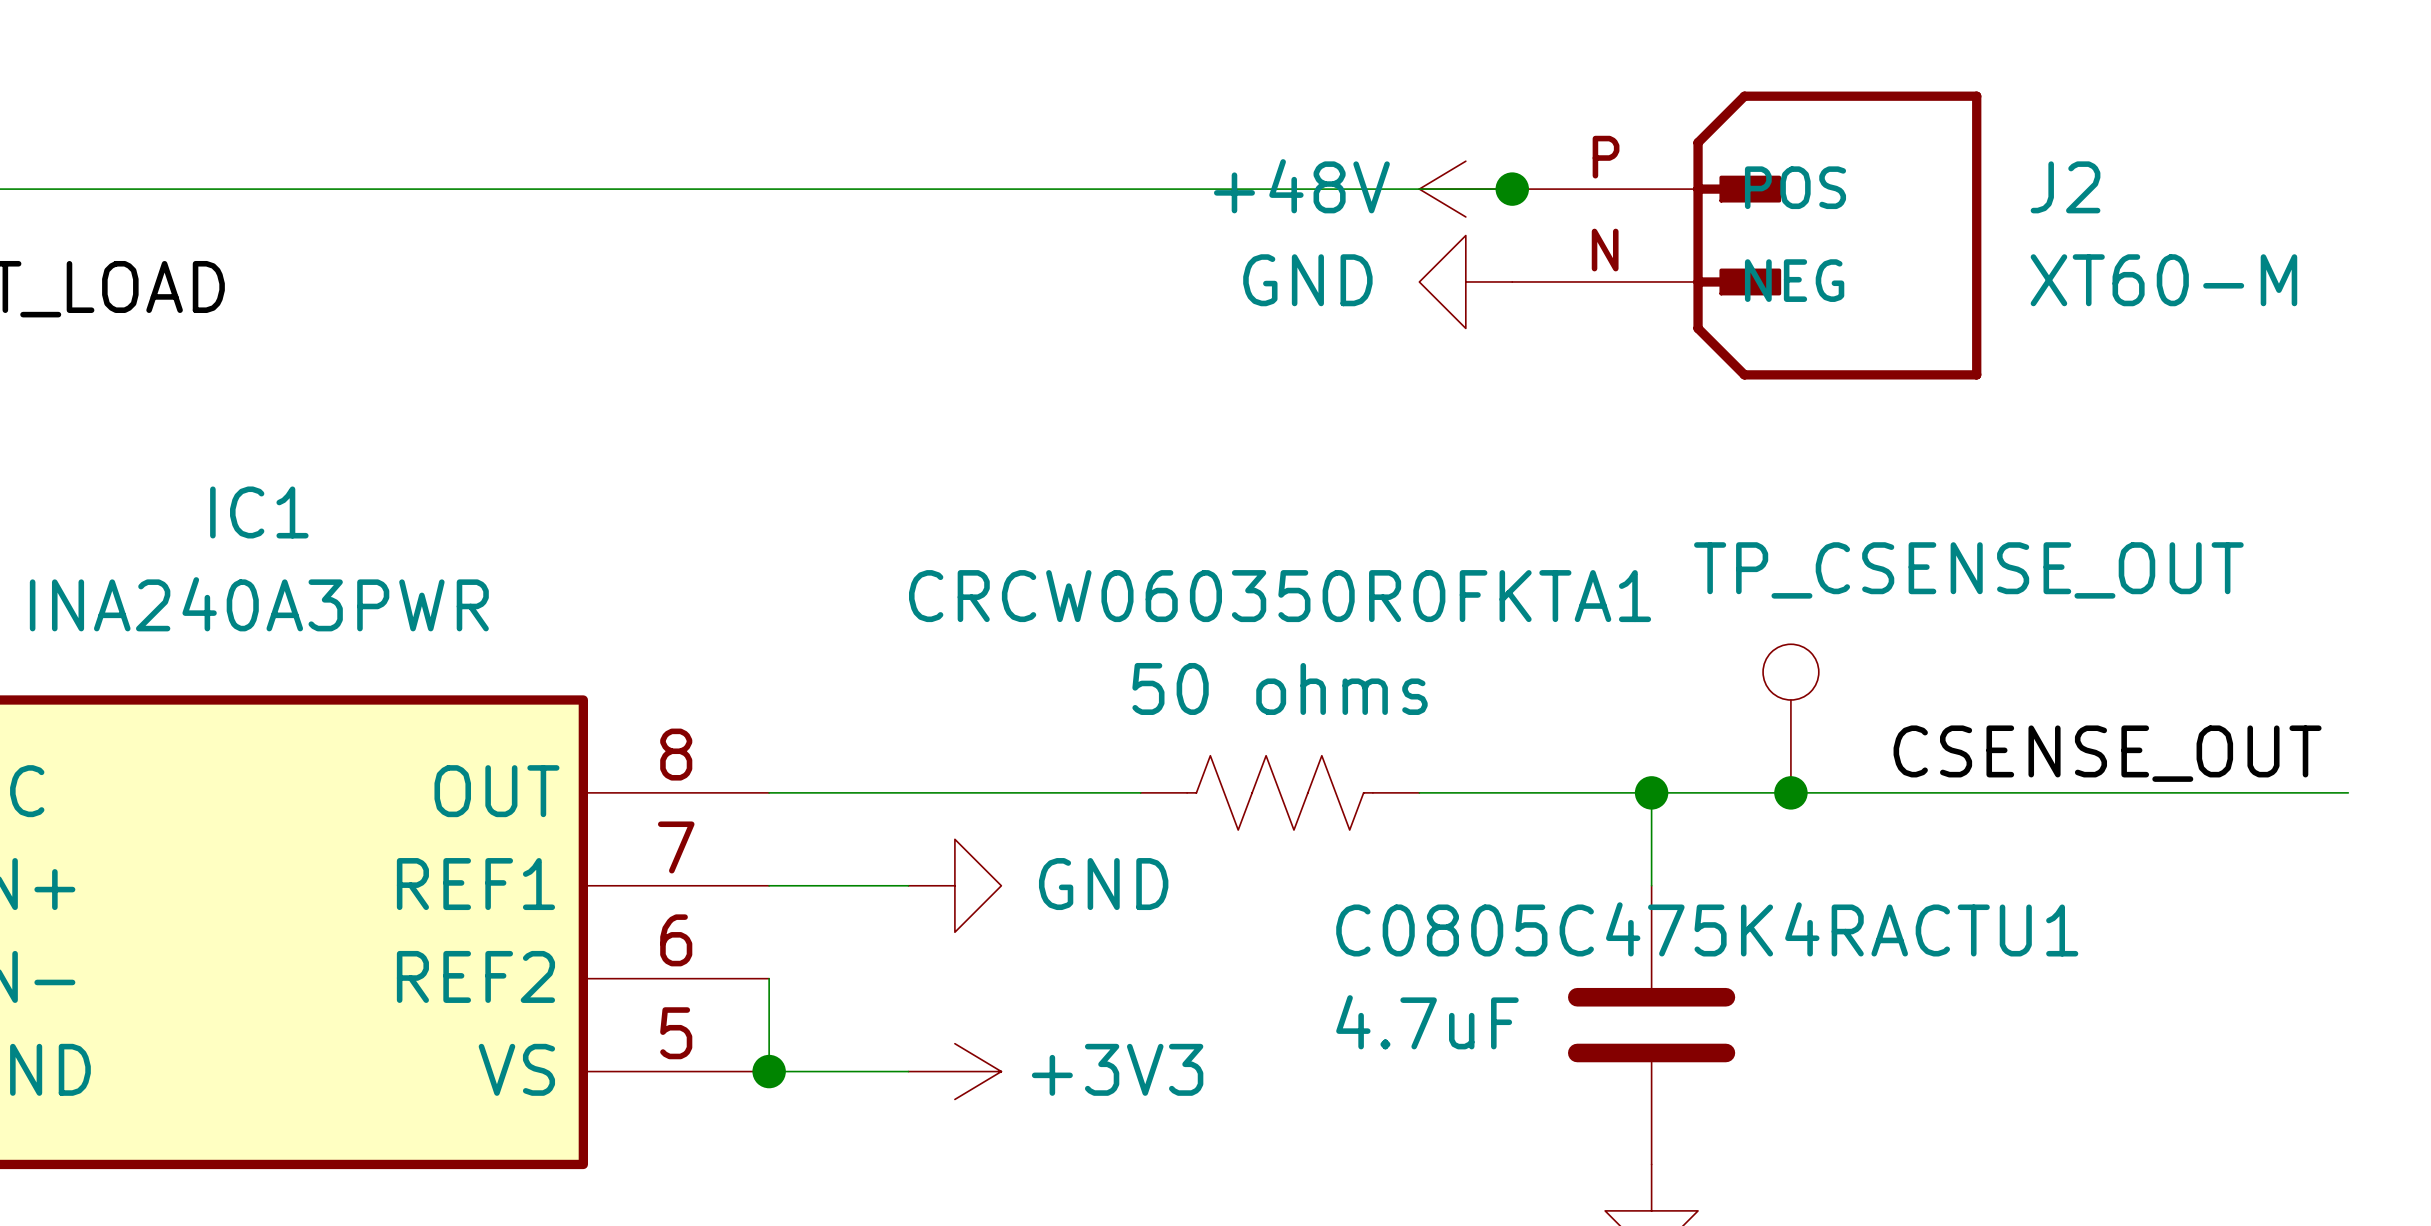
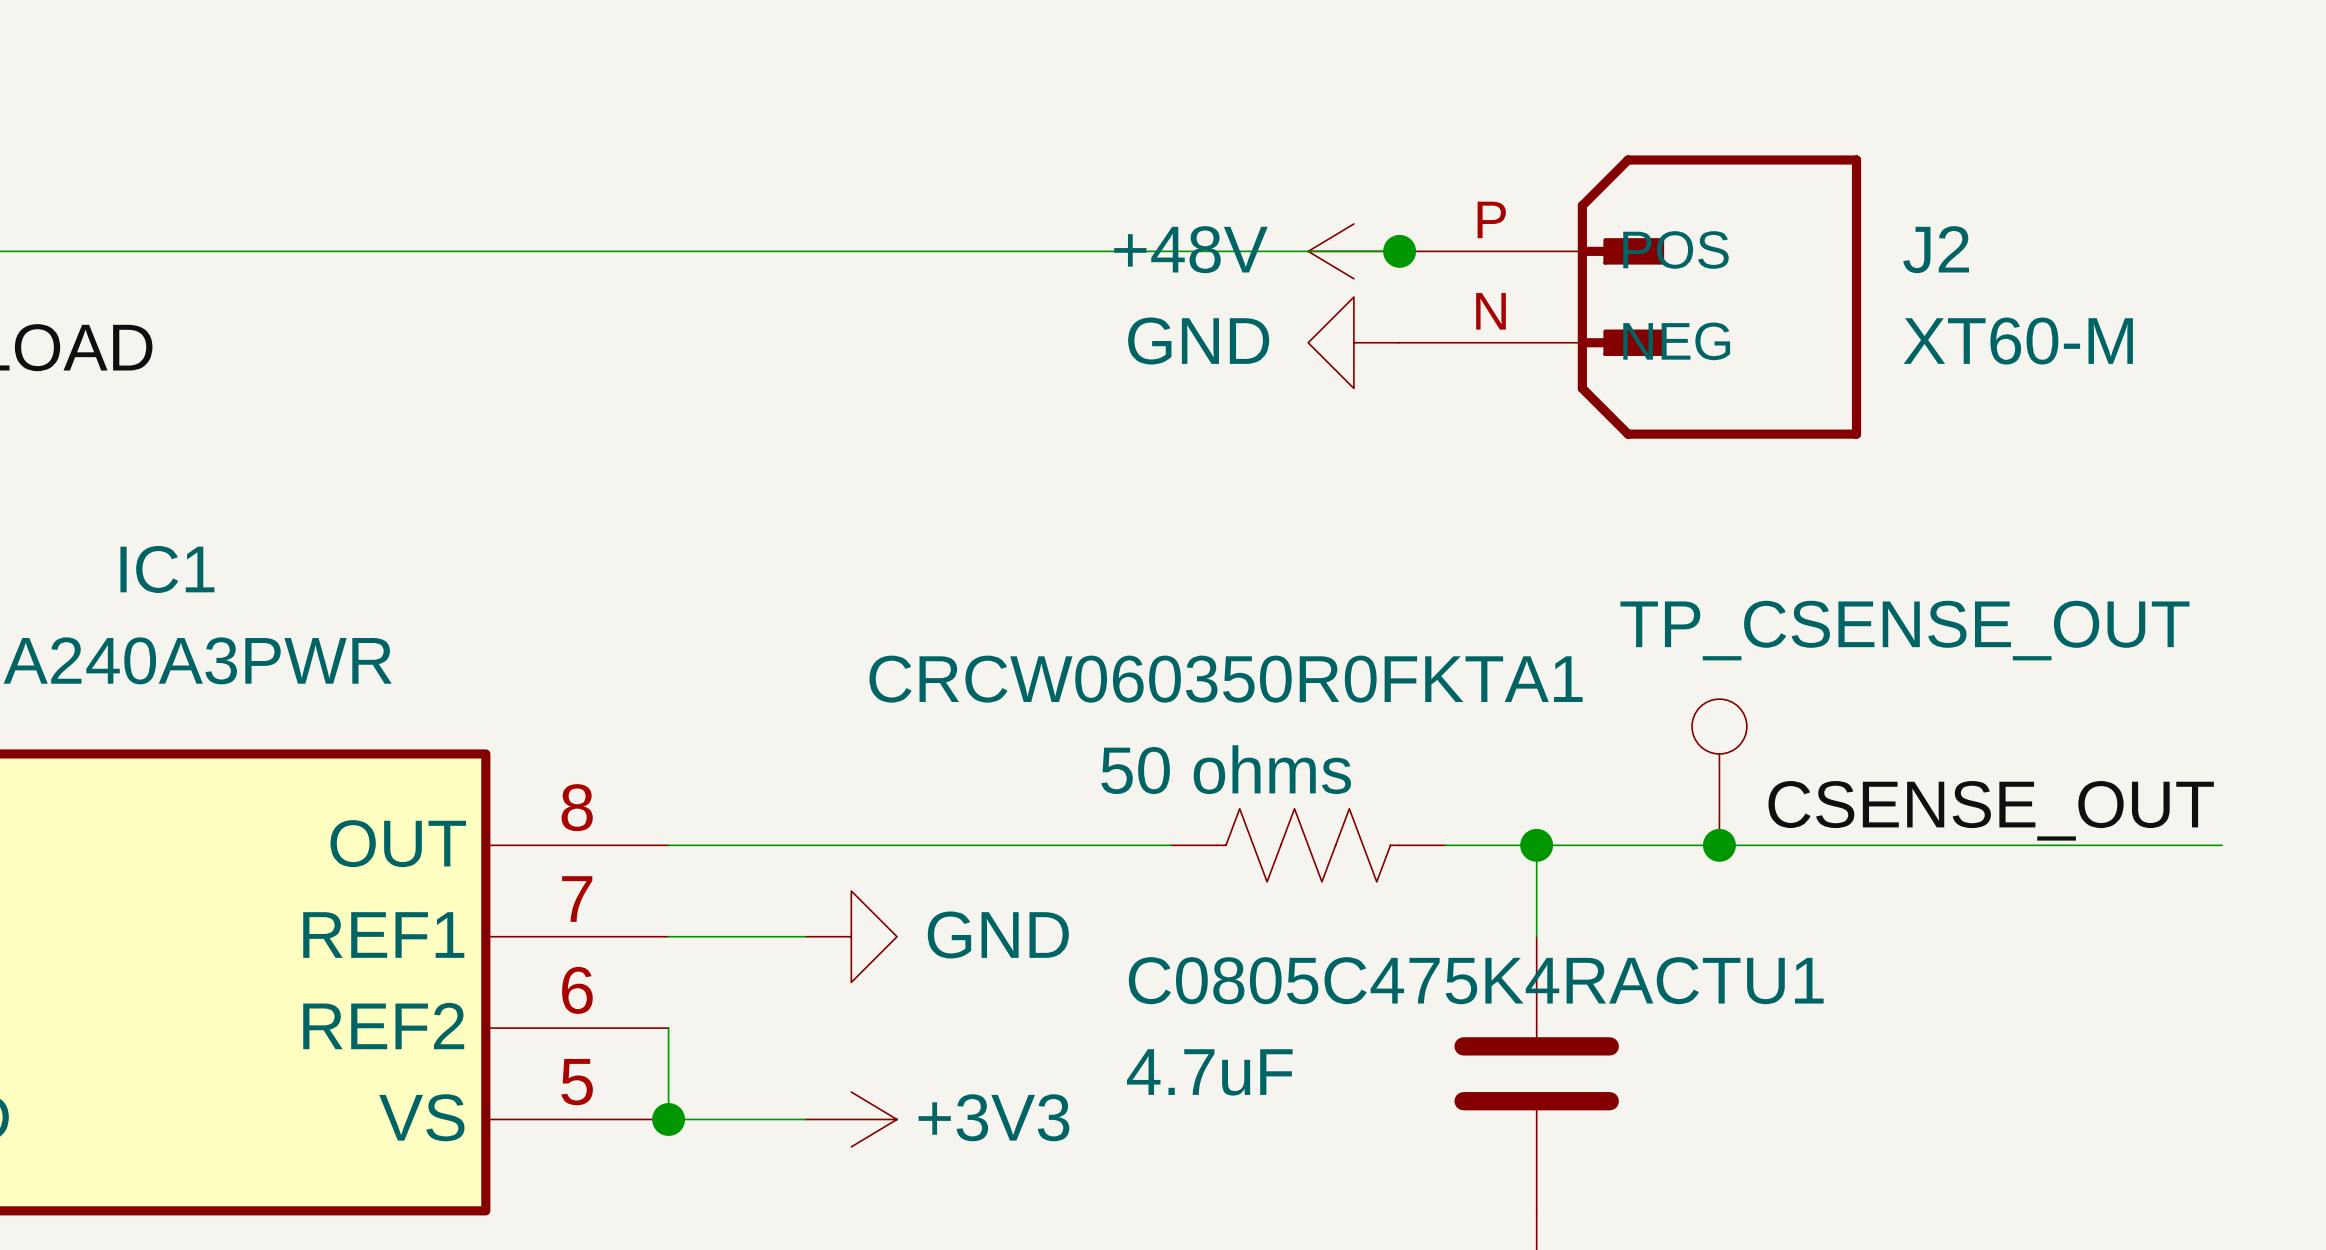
CRCW060350R0FKTA1 name position: CRCW060350R0FKTA1 (1280, 596) -> CRCW060350R0FKTA1 (1226, 679)
CRCW060350R0FKTA1 value position: 50 ohms (1280, 688) -> 50 ohms (1226, 769)
TP_CSENSE_OUT position: (1790, 718) -> (1719, 772)
CRCW060350R0FKTA1 position: (1280, 792) -> (1308, 845)
wire: (1419, 792) (1558, 792) -> (1034, 845) (1171, 845)
junction position: (1790, 792) -> (1719, 845)
C0805C475K4RACTU1 name position: C0805C475K4RACTU1 (1707, 929) -> C0805C475K4RACTU1 (1476, 980)
C0805C475K4RACTU1 value position: 4.7uF (1427, 1022) -> 4.7uF (1209, 1072)

